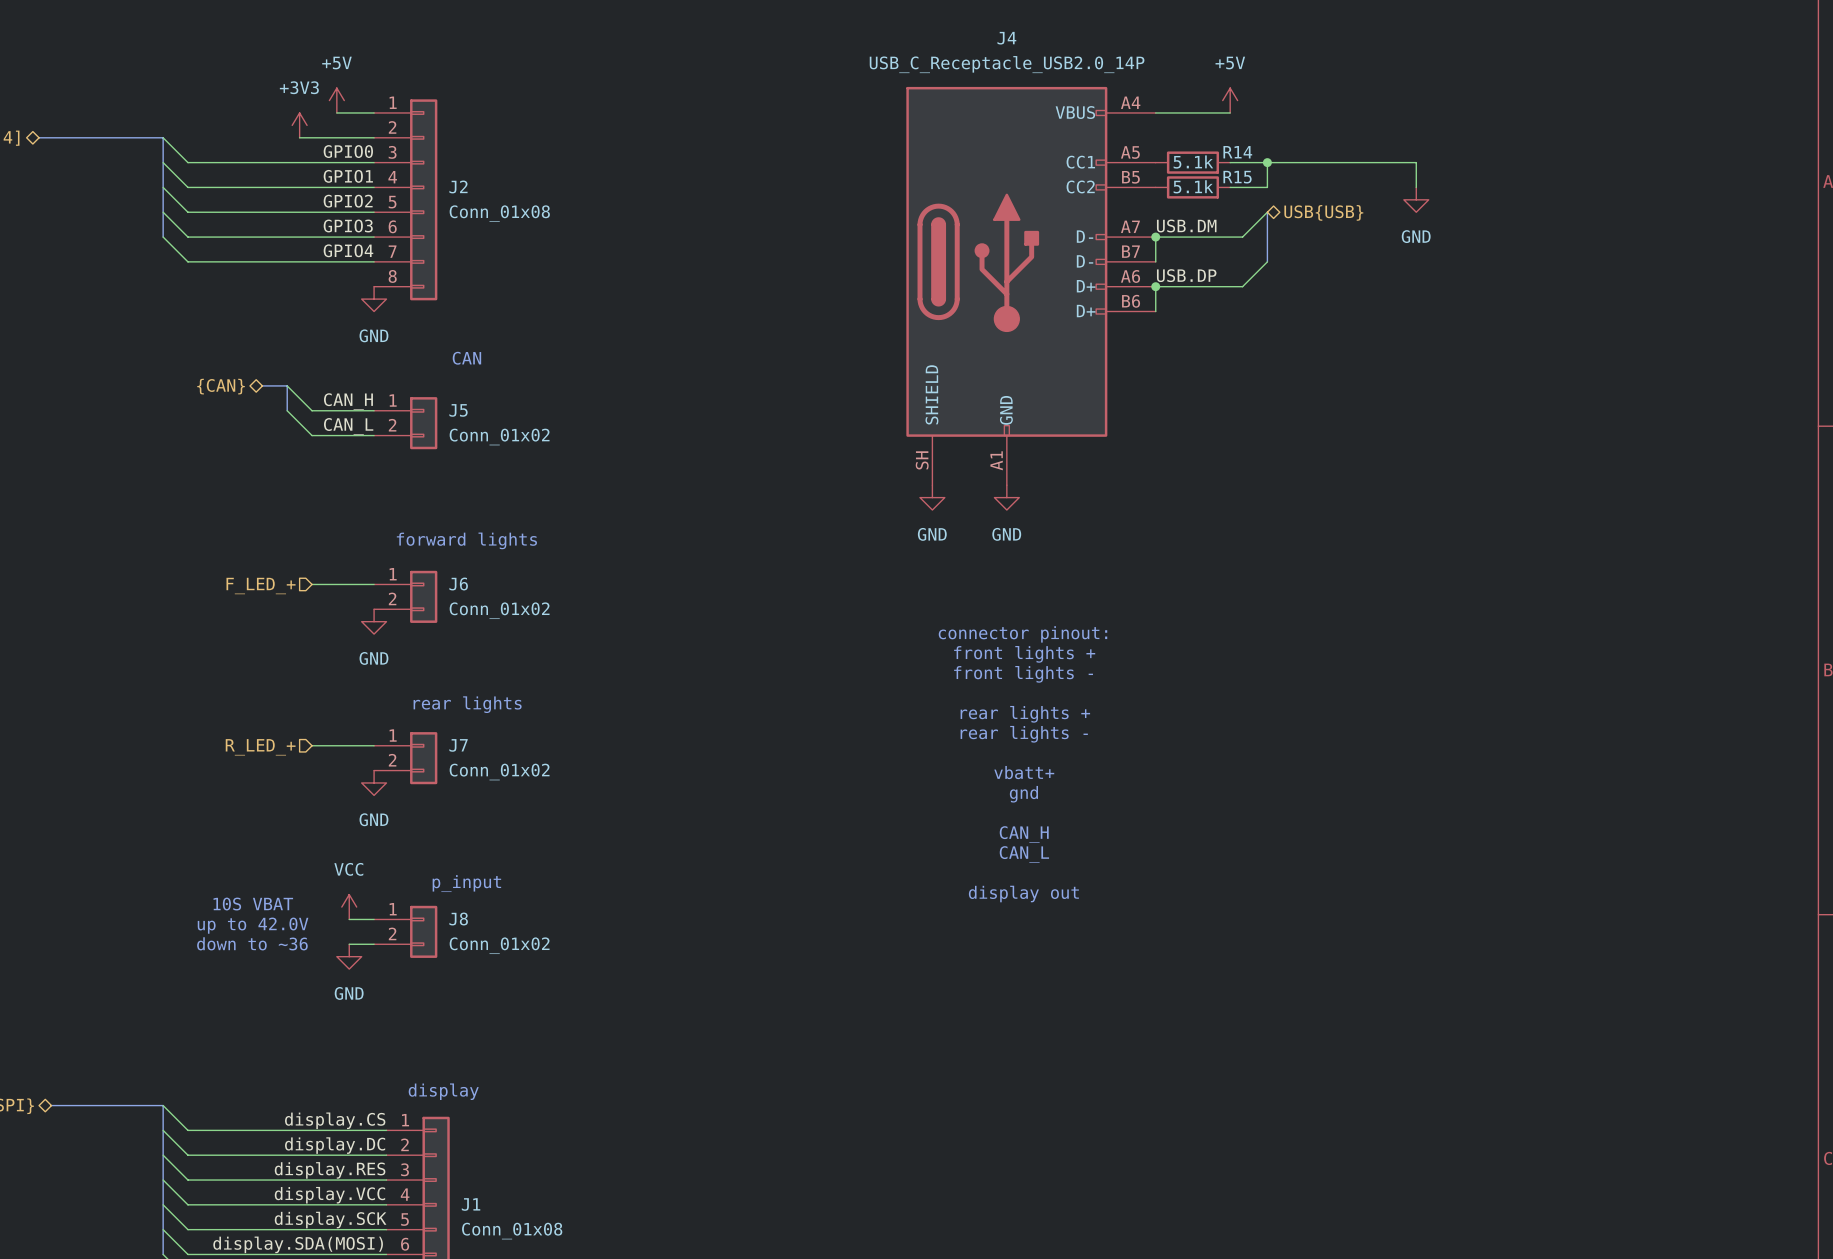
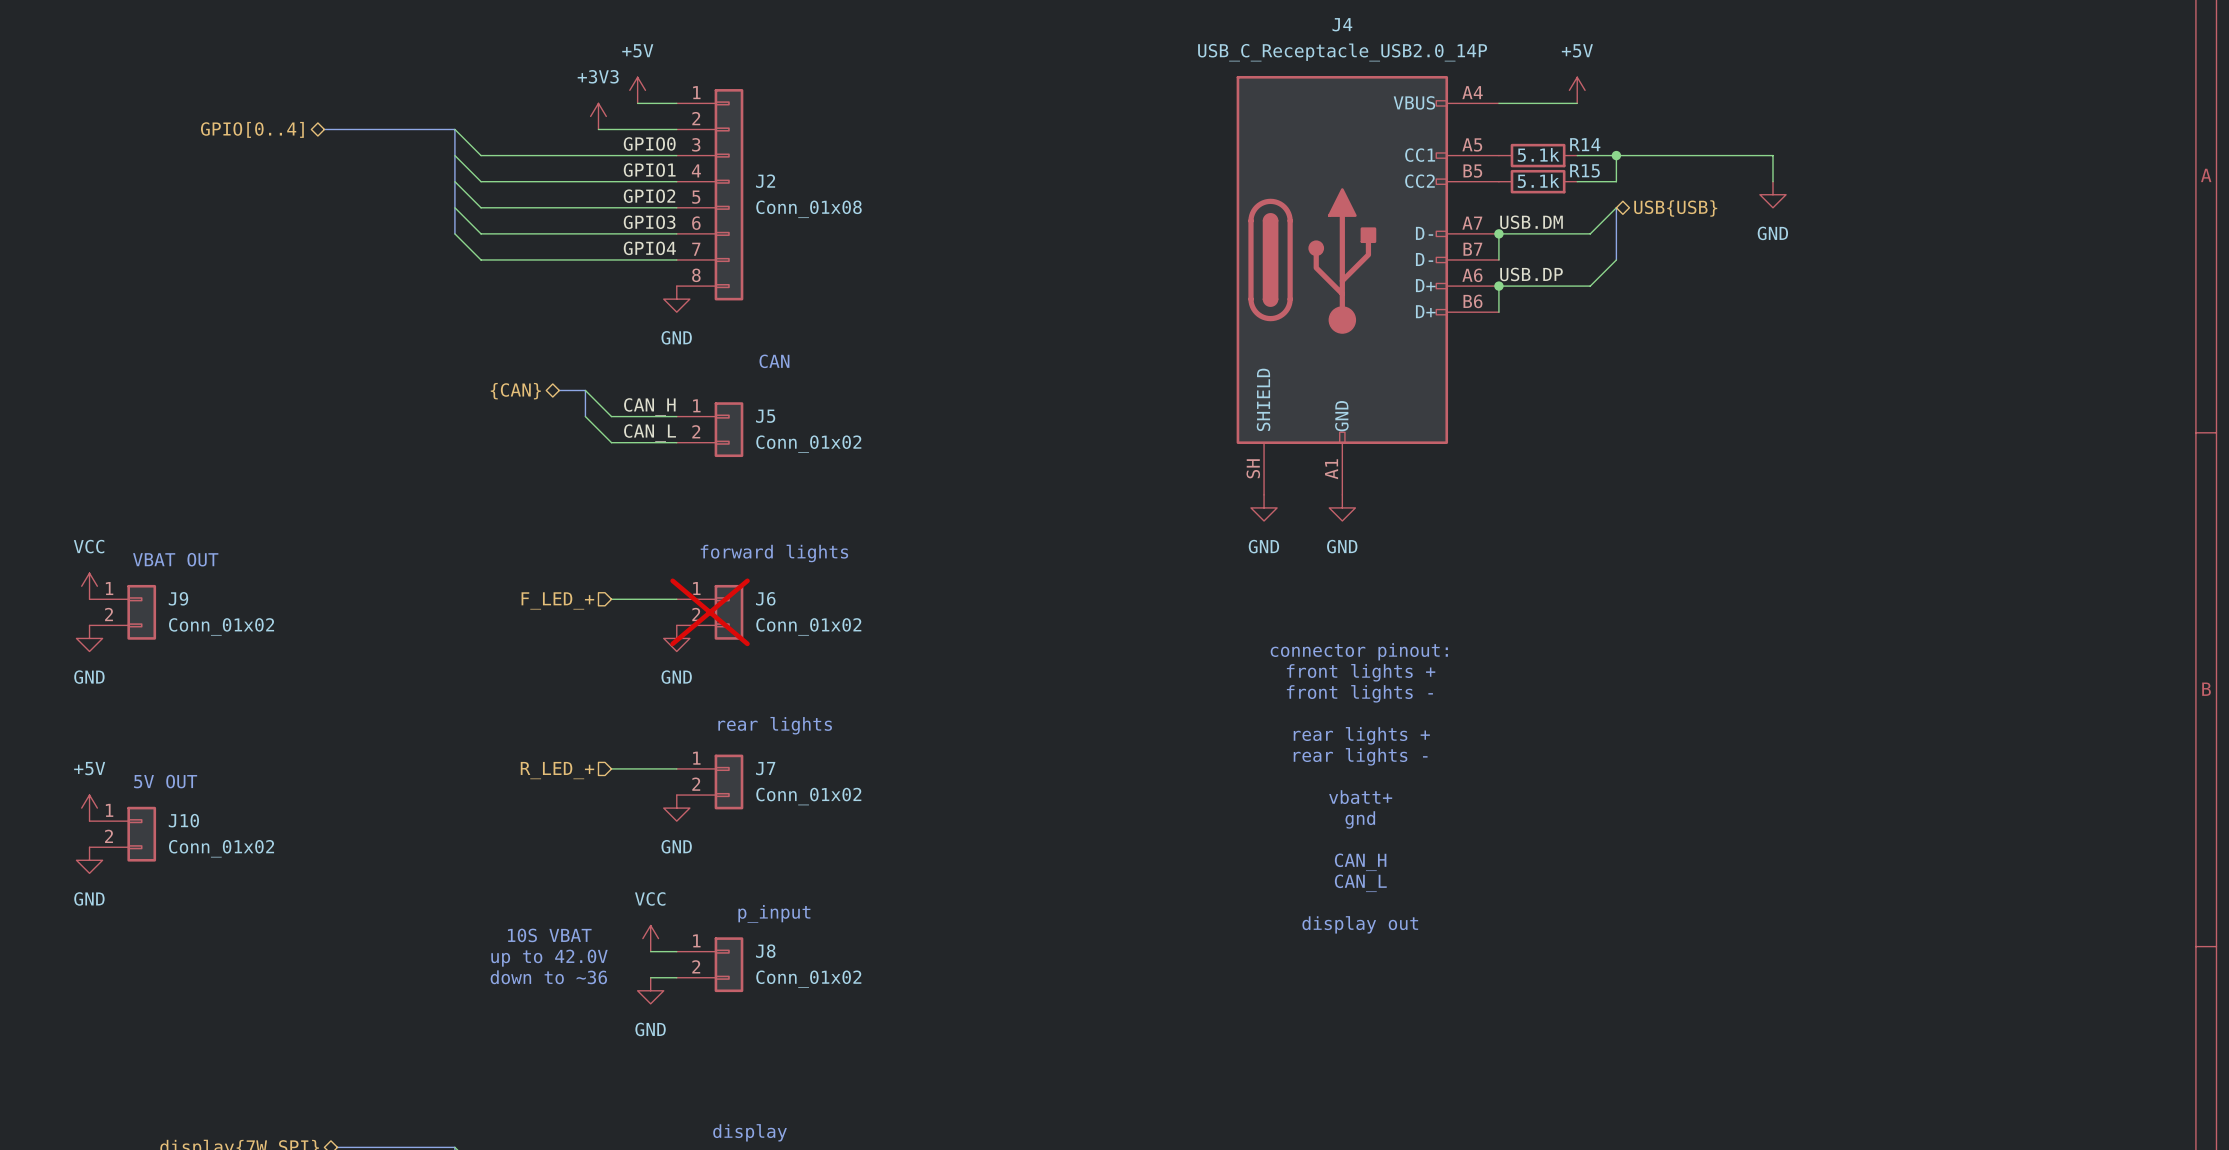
J6 do-not-place cross: none -> (710, 612)

